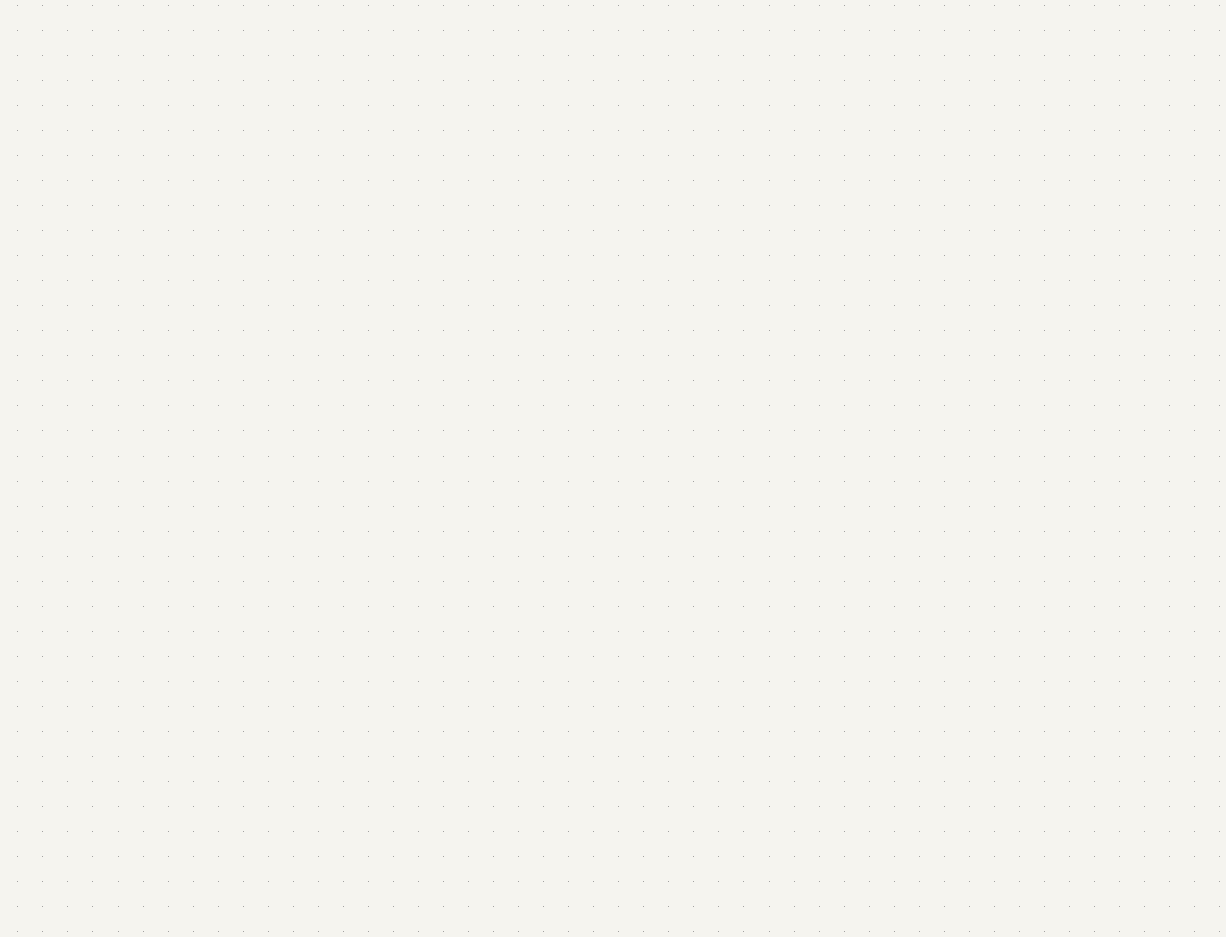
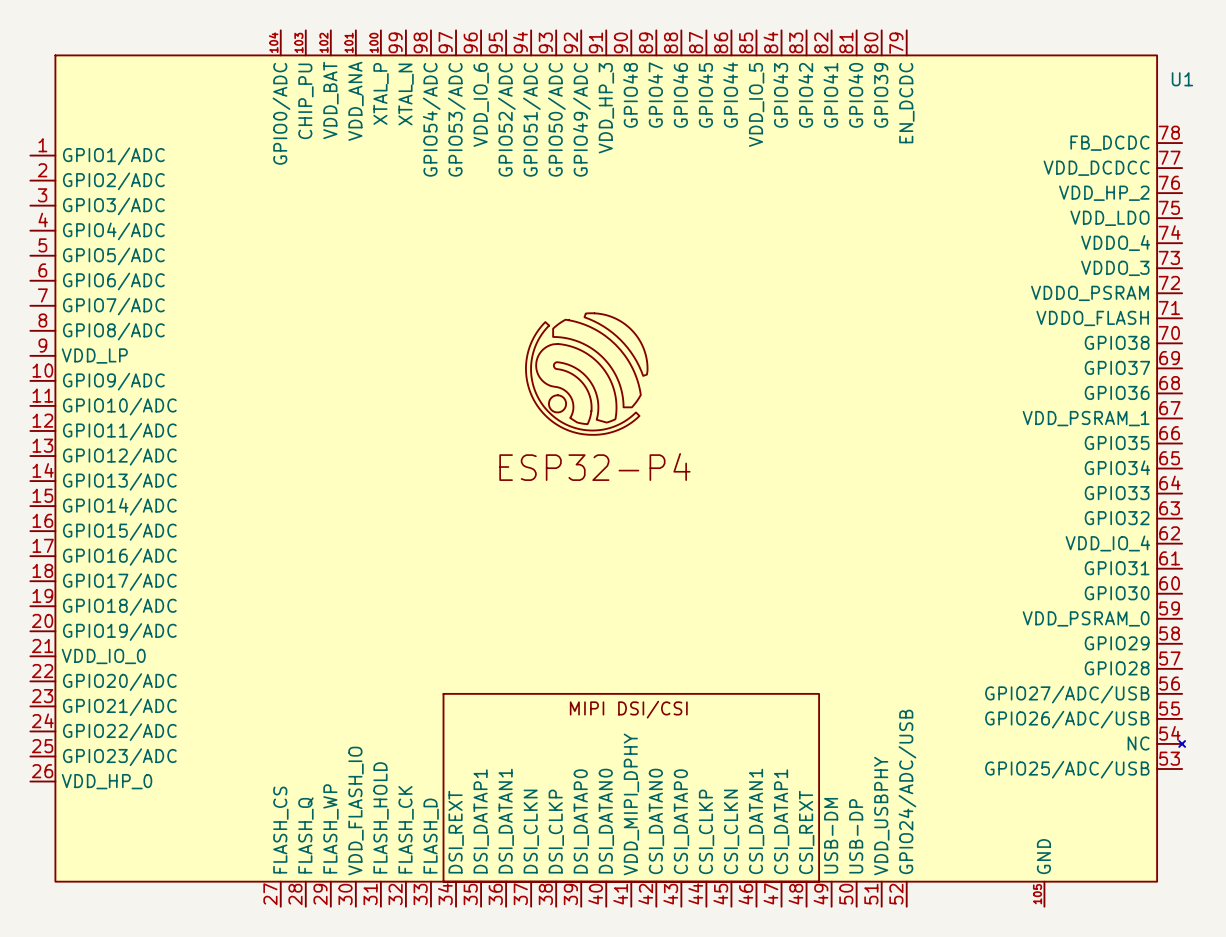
U1: none -> (607, 468)

